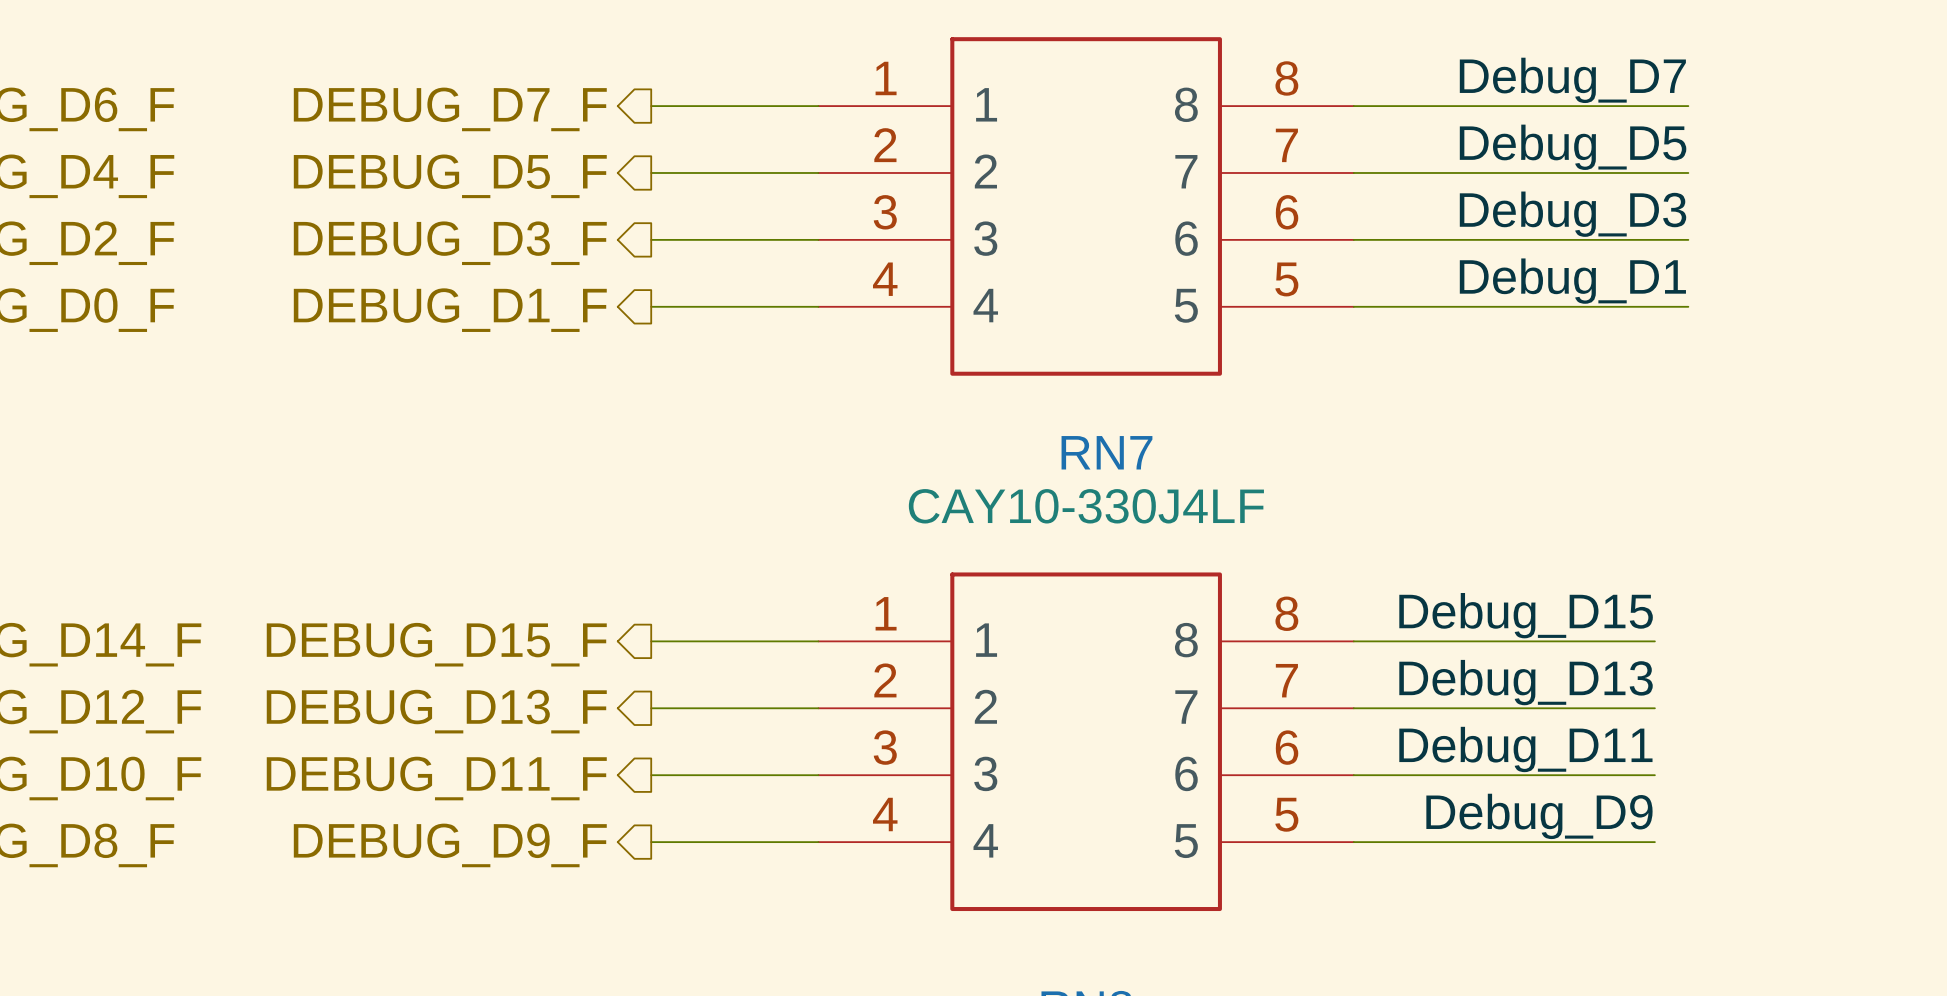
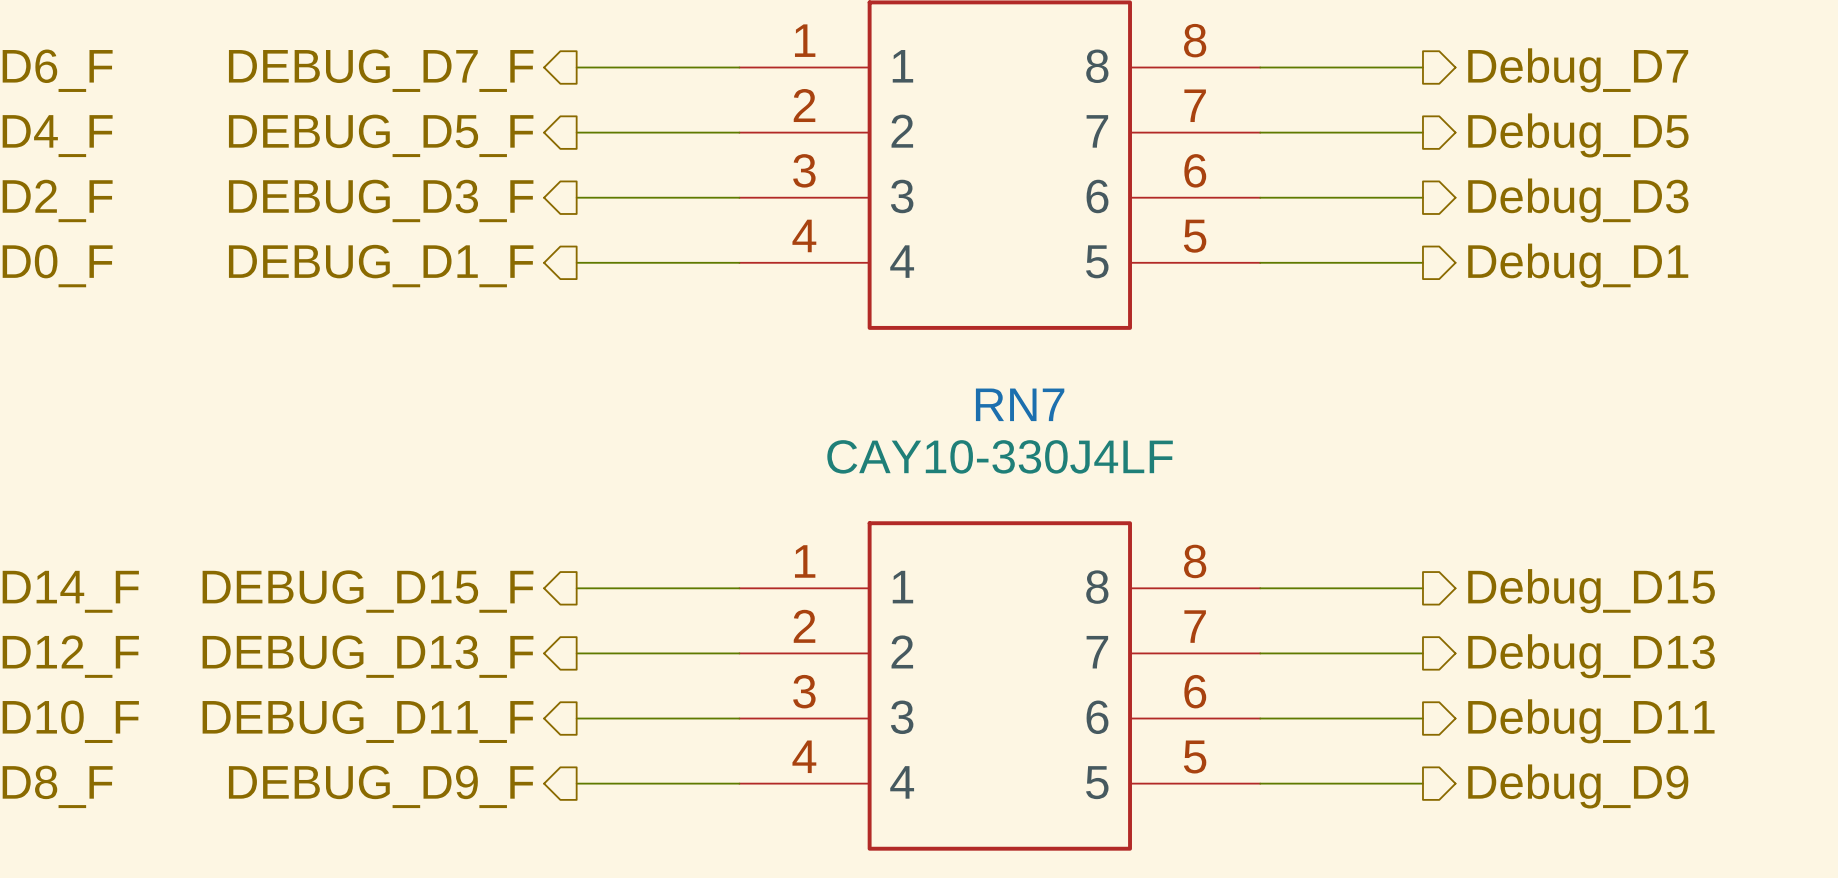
label: Debug_D7 (1572, 80) -> none
wire: (1521, 106) (1688, 106) -> none
hierarchical label: none -> Debug_D7 (1578, 70)
label: Debug_D5 (1573, 147) -> none
wire: (1521, 172) (1688, 172) -> none
hierarchical label: none -> Debug_D5 (1578, 135)
label: Debug_D3 (1573, 214) -> none
wire: (1521, 239) (1688, 239) -> none
hierarchical label: none -> Debug_D3 (1578, 200)
label: Debug_D1 (1572, 281) -> none
wire: (1521, 306) (1688, 306) -> none
hierarchical label: none -> Debug_D1 (1578, 265)
label: Debug_D15 (1526, 615) -> none
wire: (1521, 641) (1654, 641) -> none
hierarchical label: none -> Debug_D15 (1591, 591)
label: Debug_D13 (1526, 682) -> none
wire: (1521, 708) (1654, 708) -> none
hierarchical label: none -> Debug_D13 (1591, 656)
label: Debug_D11 (1525, 749) -> none
wire: (1521, 775) (1654, 775) -> none
hierarchical label: none -> Debug_D11 (1591, 721)
label: Debug_D9 (1539, 816) -> none
wire: (1521, 842) (1654, 842) -> none
hierarchical label: none -> Debug_D9 (1578, 786)

